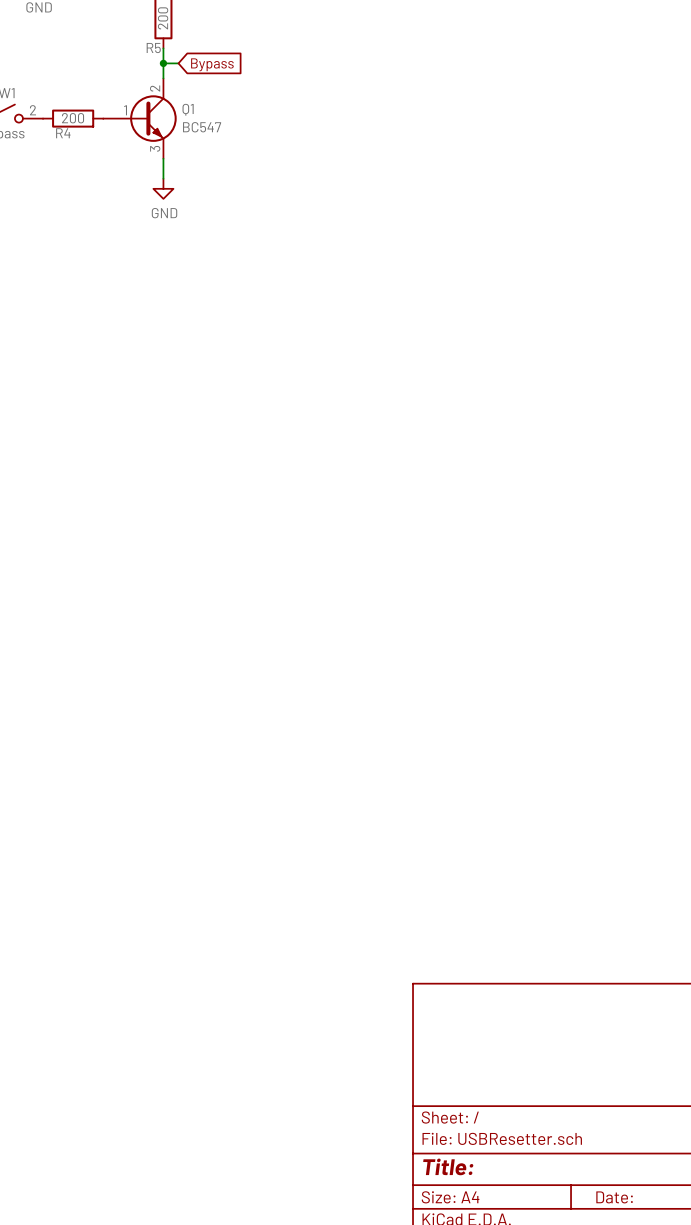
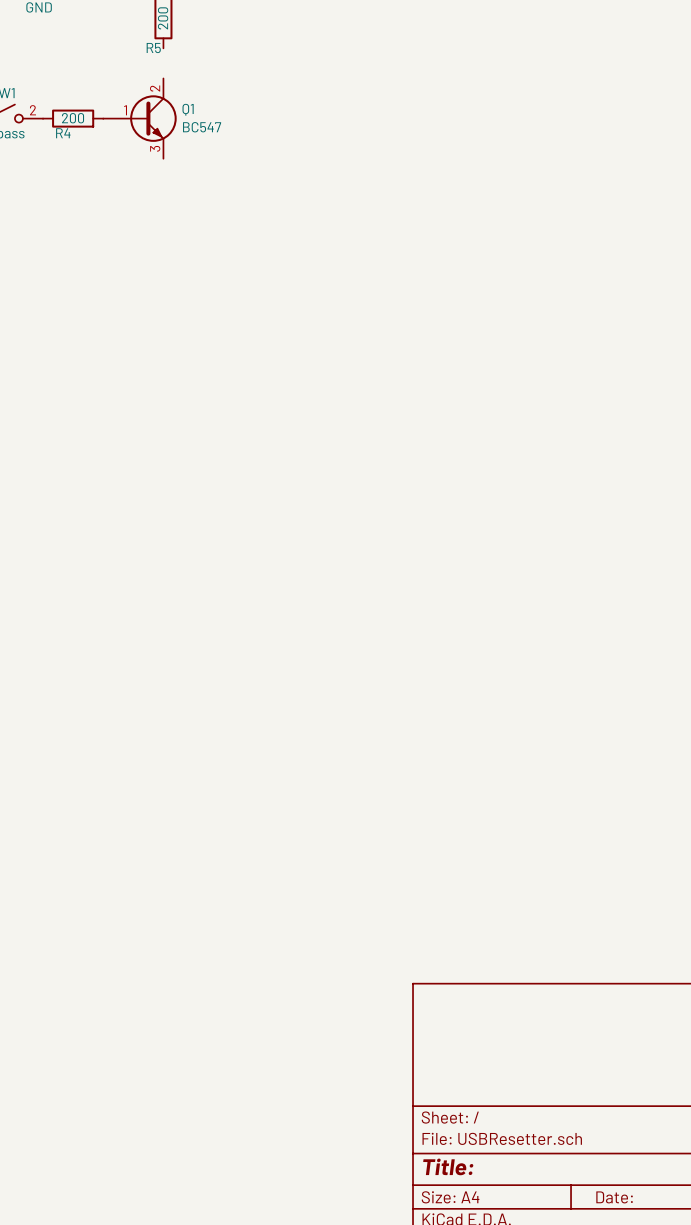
wire: (163, 48) (163, 78) -> none
wire: (163, 63) (178, 63) -> none
junction: (163, 63) -> none
global label: Bypass (212, 64) -> none
wire: (163, 158) (163, 178) -> none
power symbol: GND (163, 188) -> none

